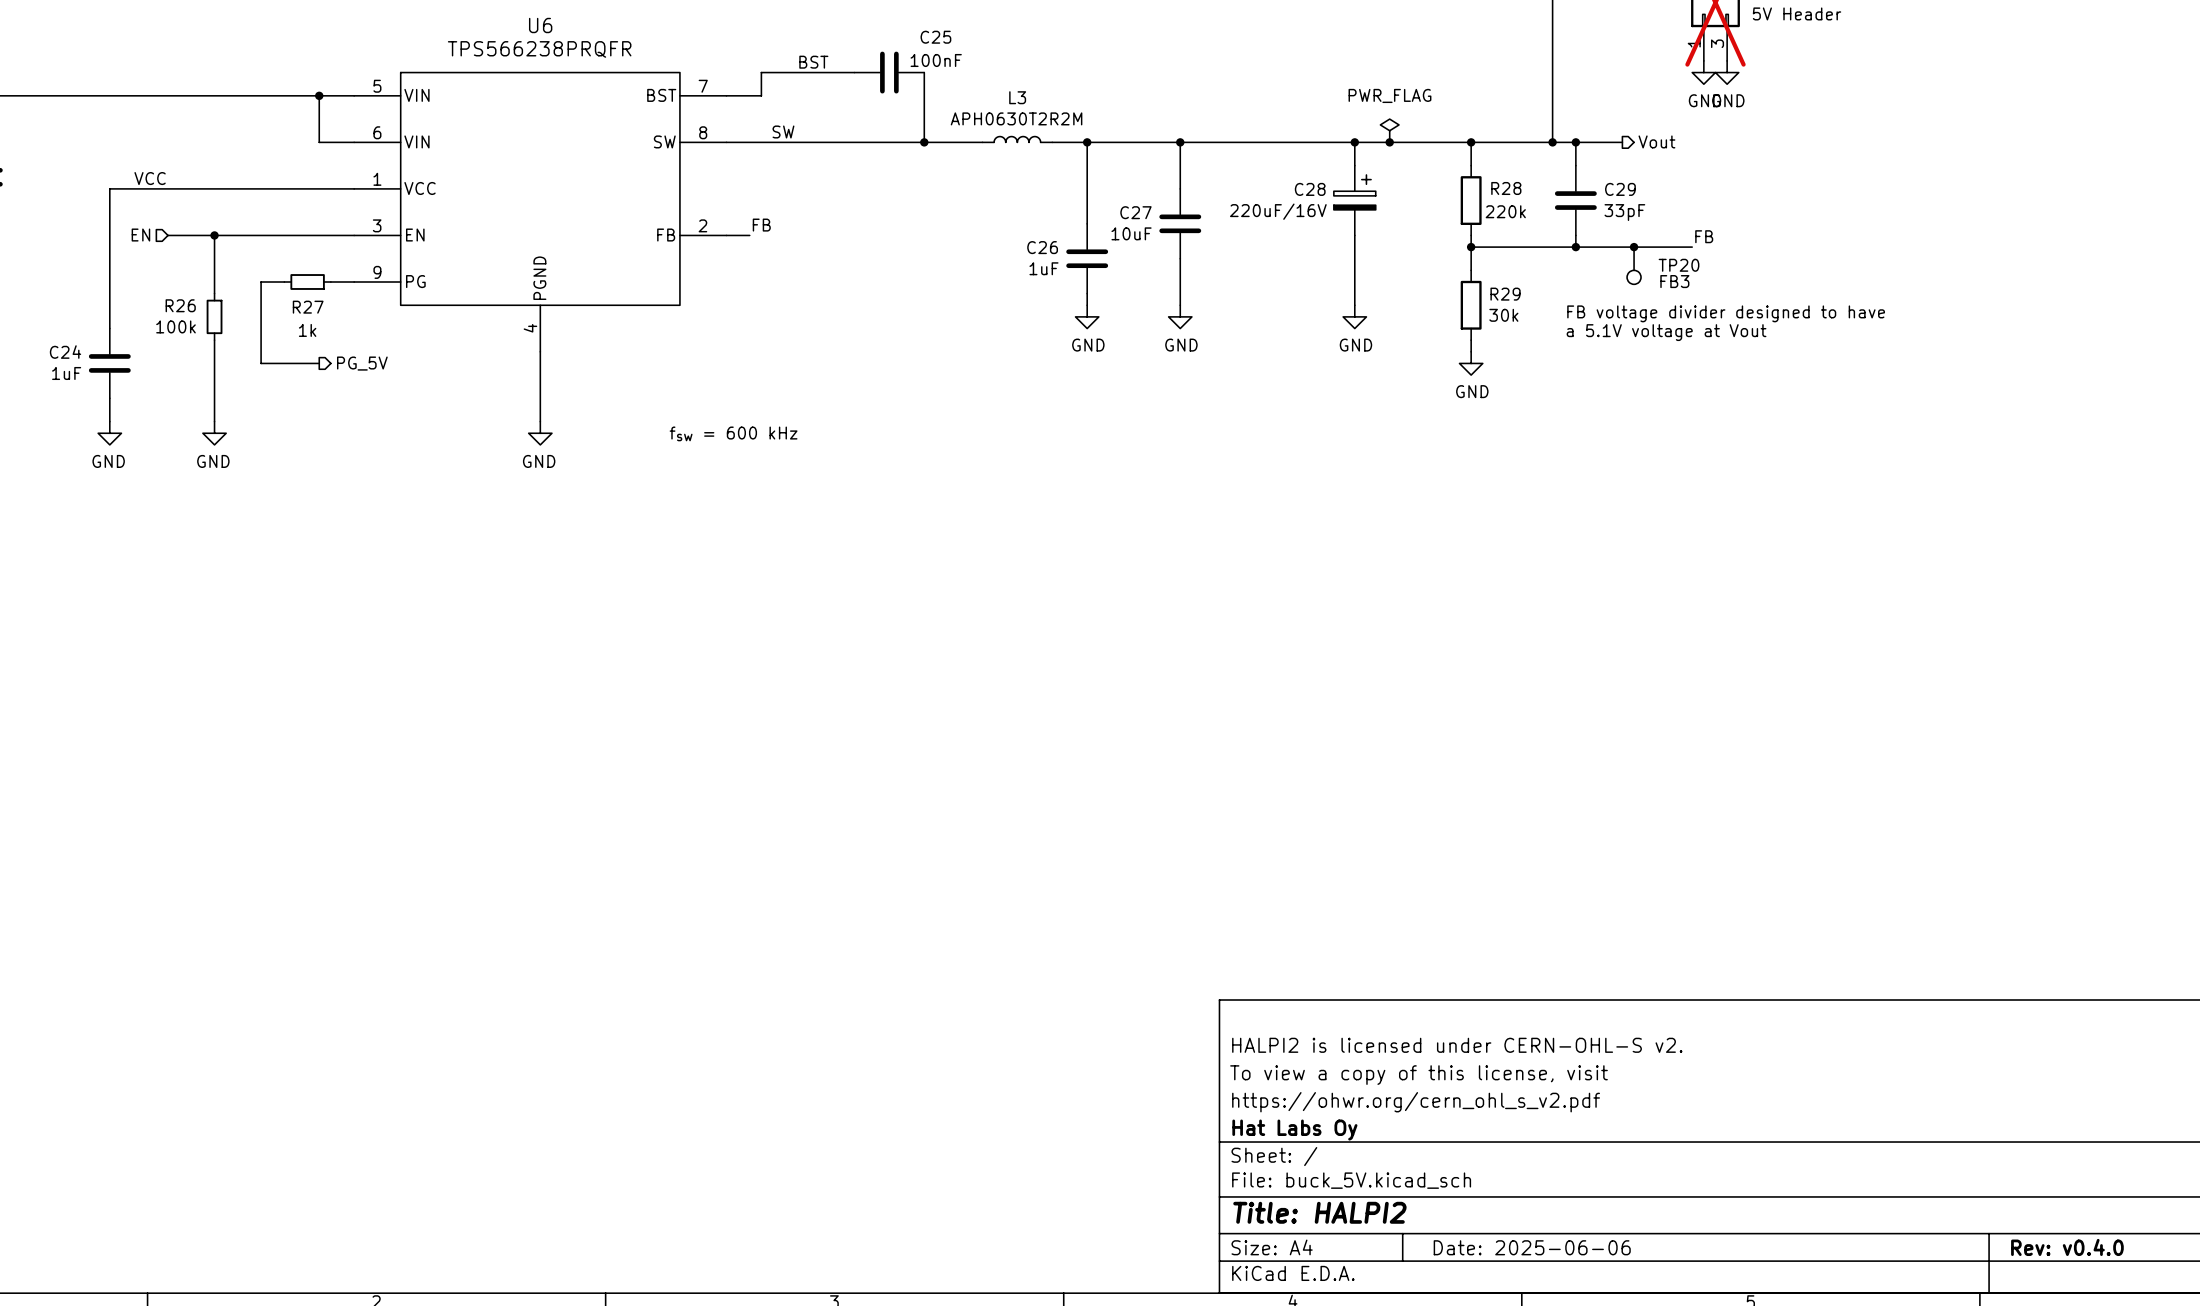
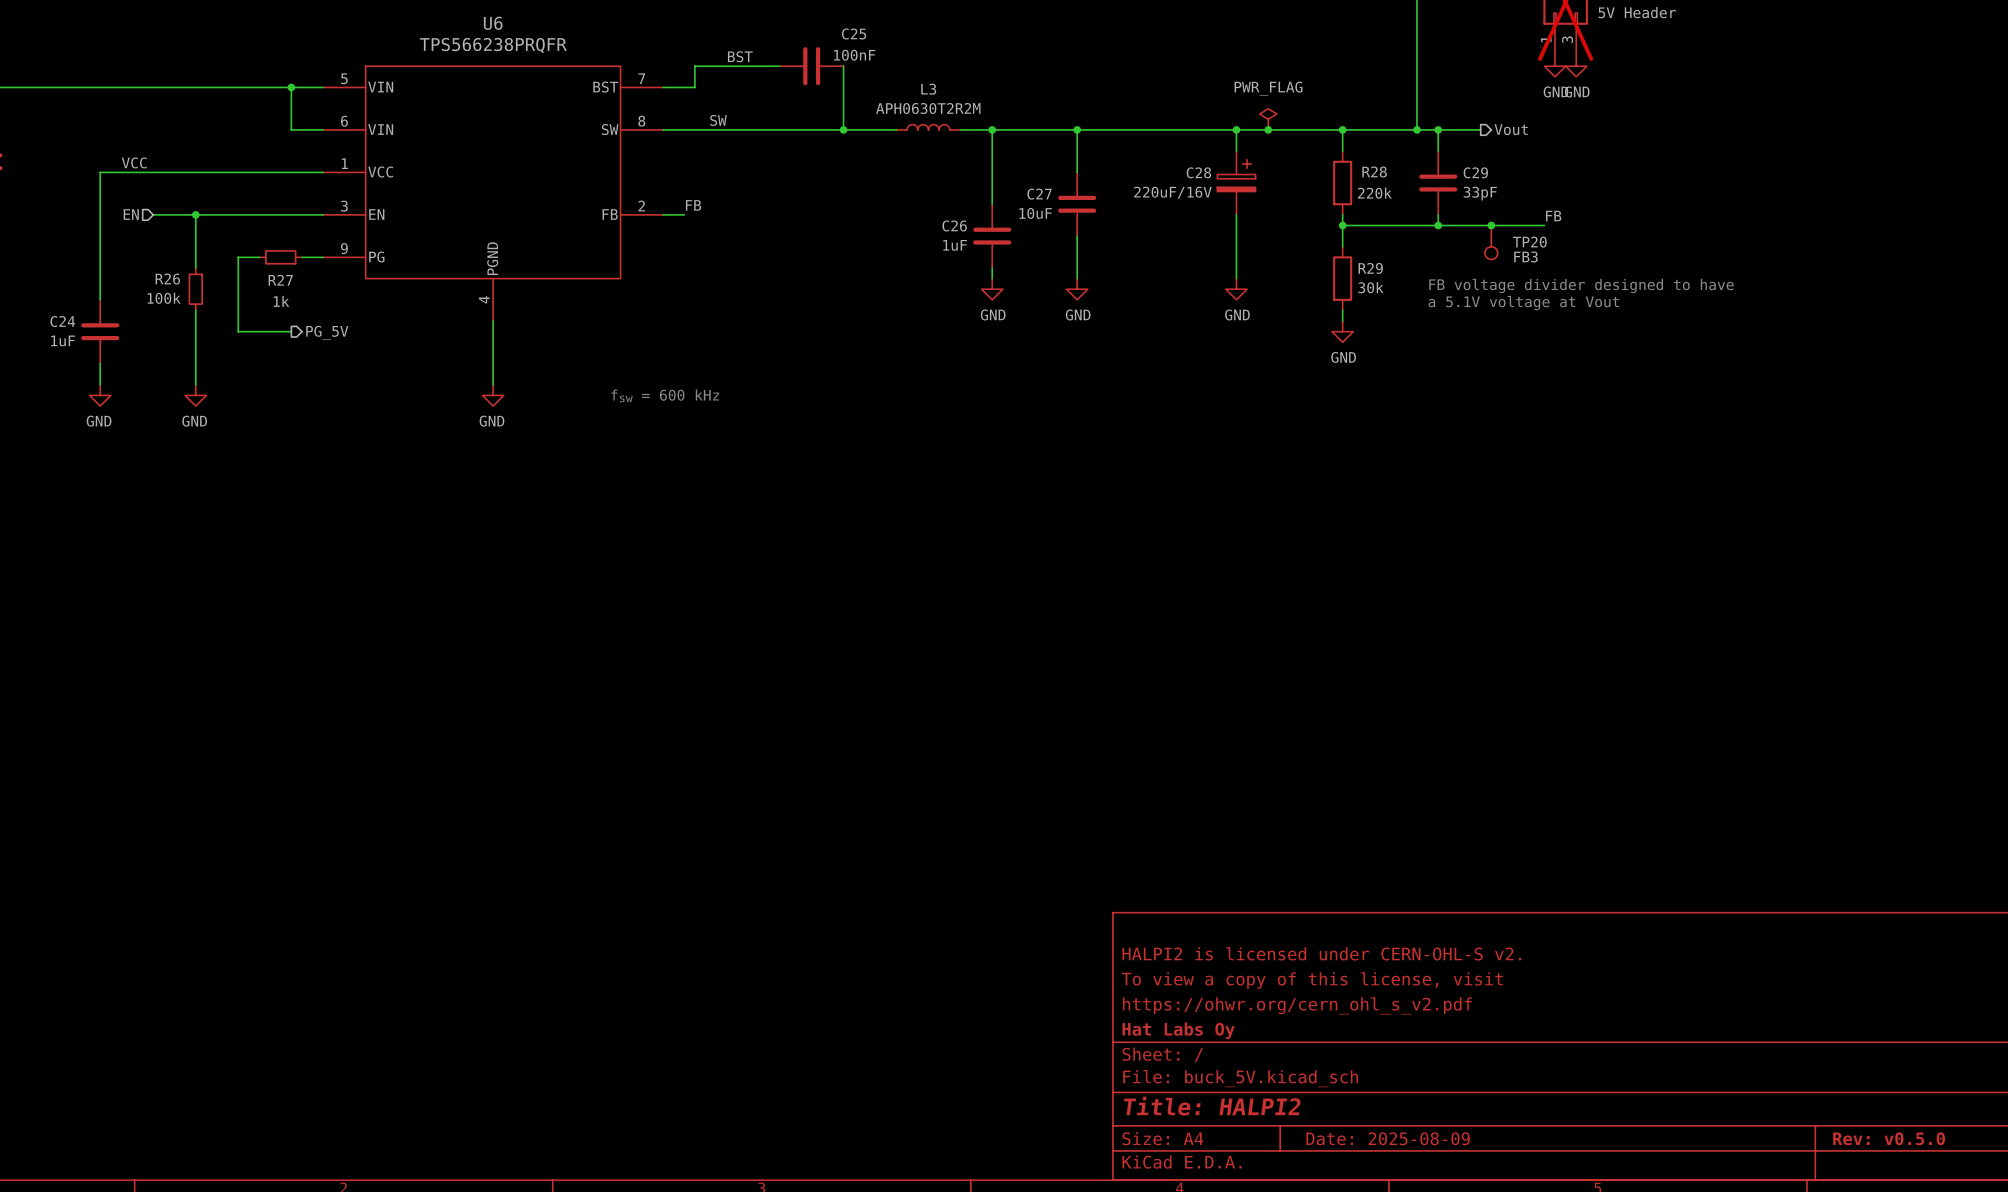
title block: Date: 2025-06-06 (1532, 1247) -> Date: 2025-08-09 (1388, 1138)
title block: Rev: v0.4.0 (2067, 1247) -> Rev: v0.5.0 (1889, 1138)

